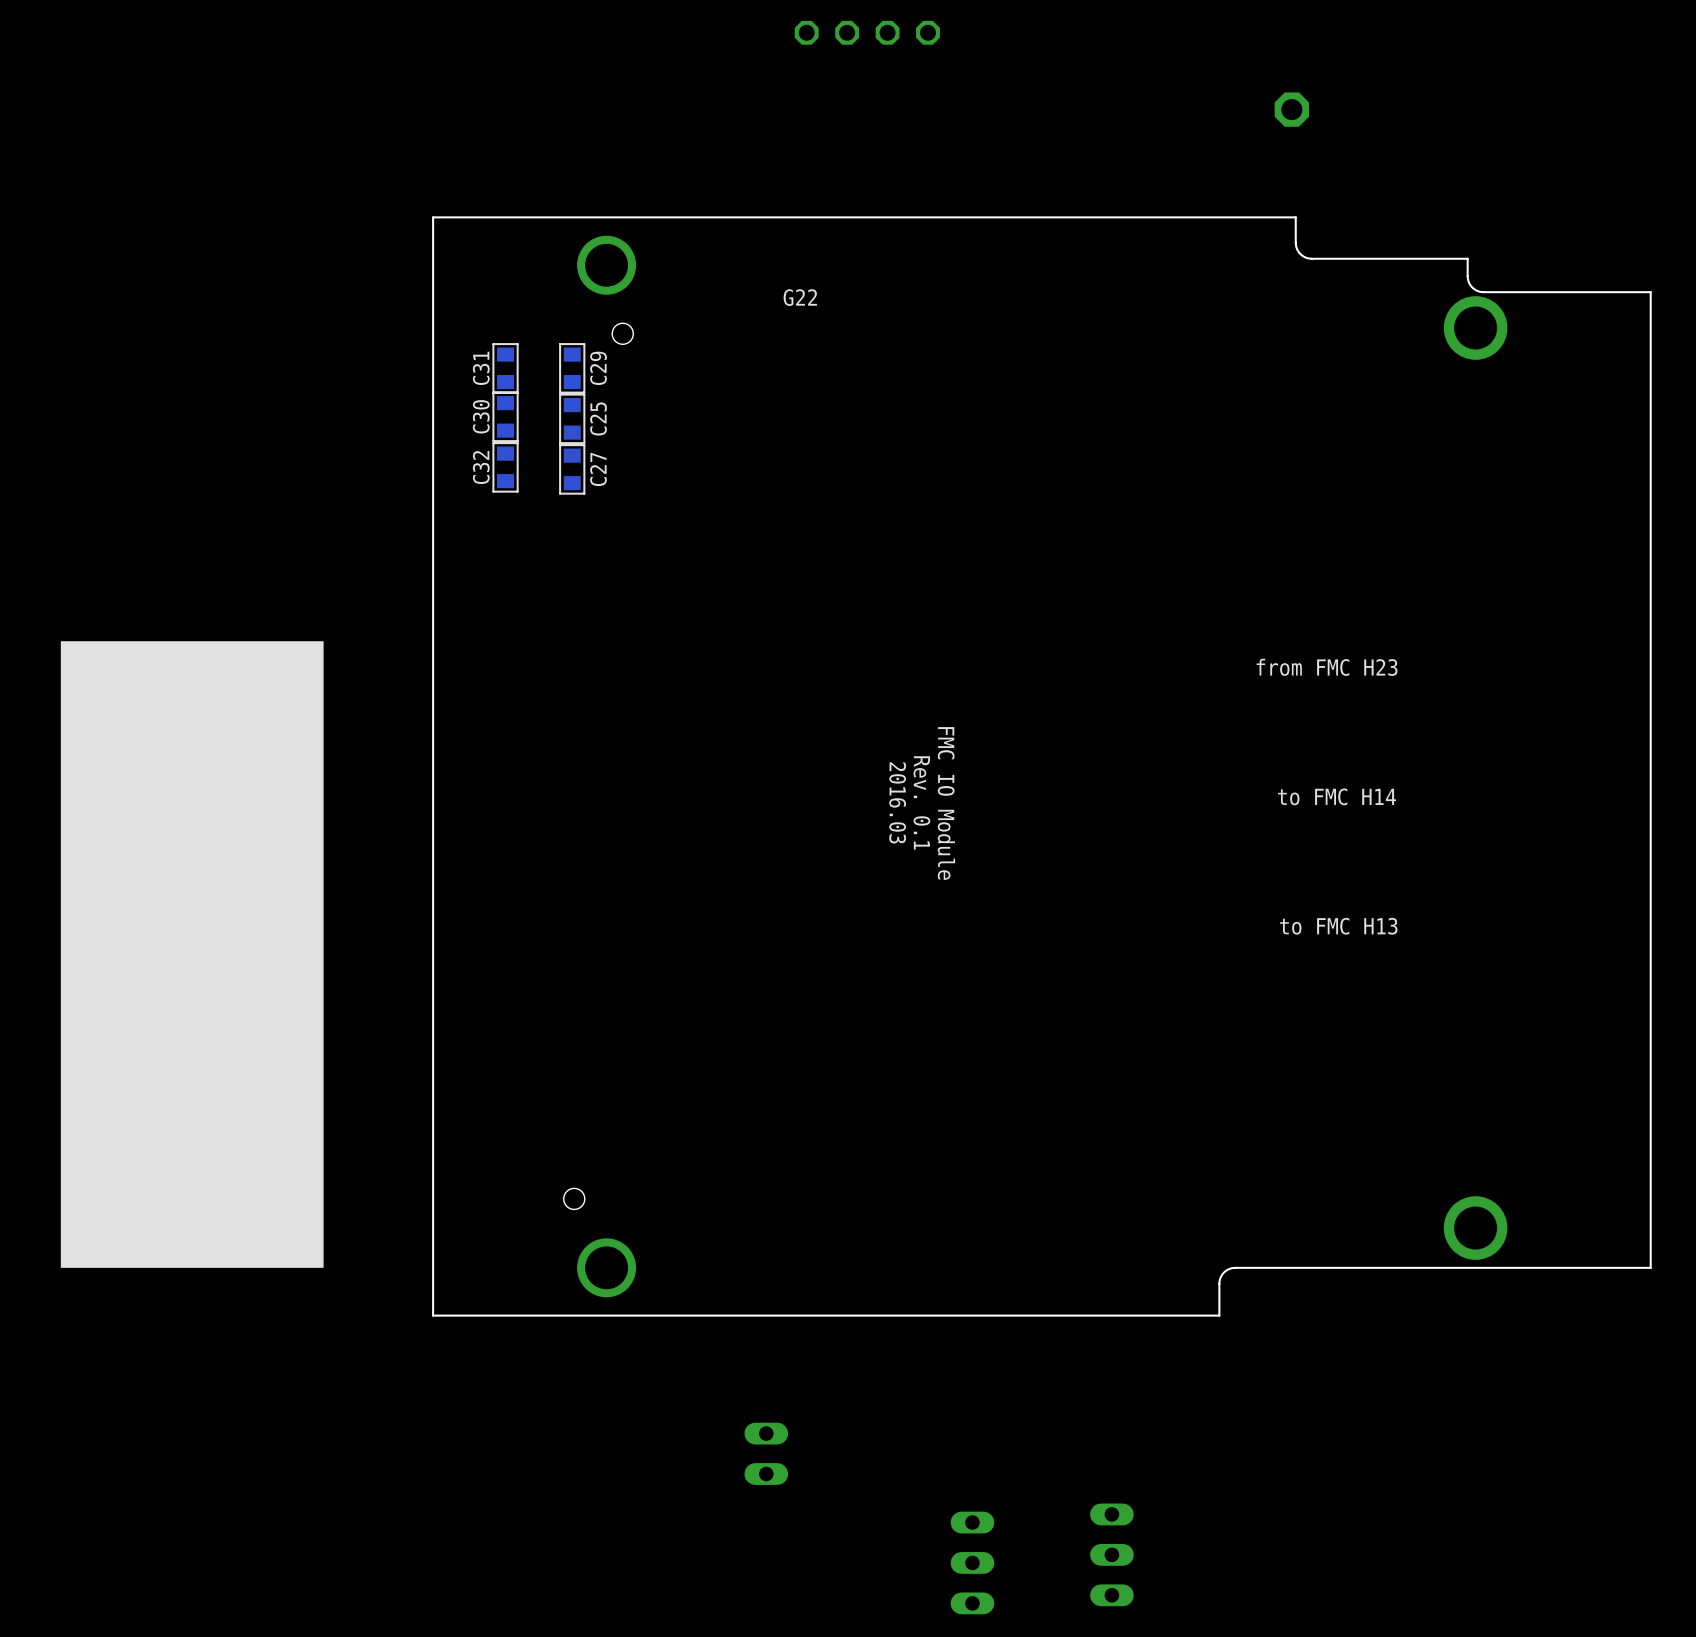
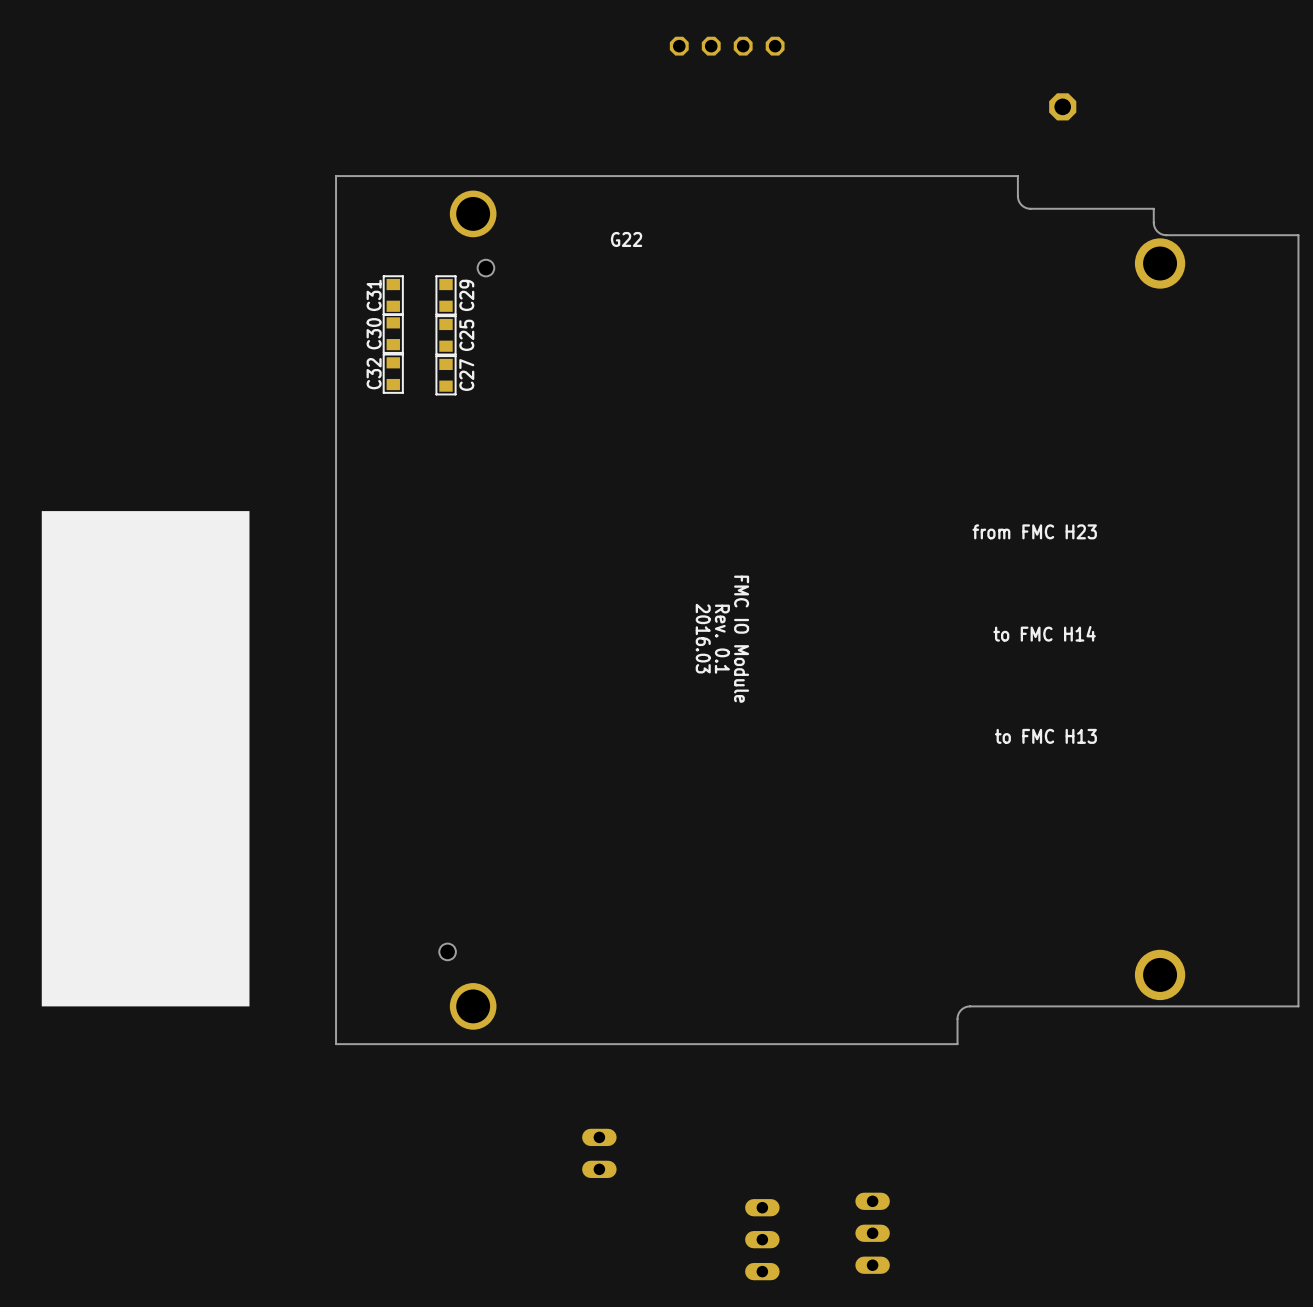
part position: (867, 32) -> (727, 46)
part position: (1291, 109) -> (1062, 106)

